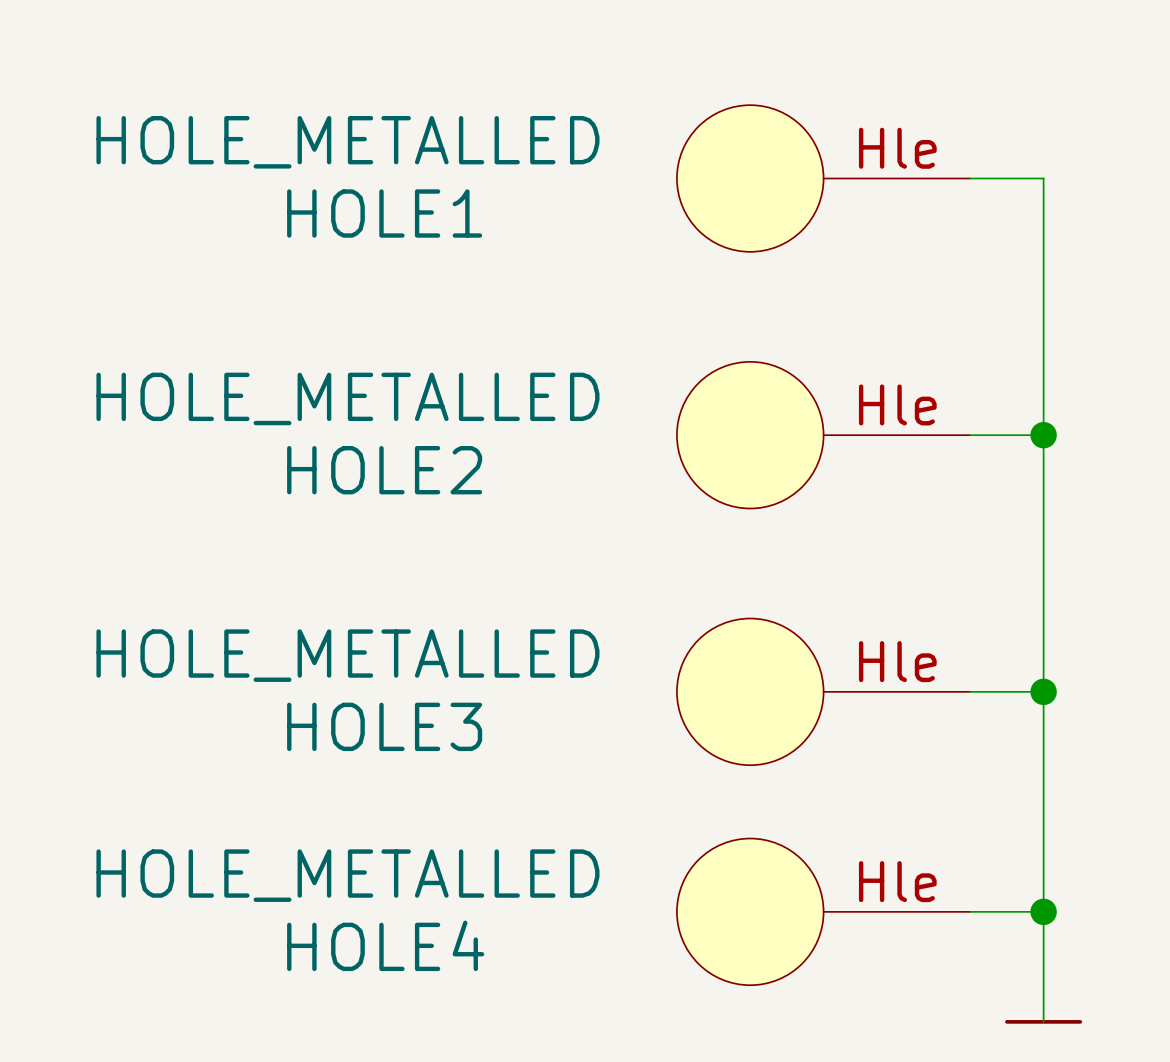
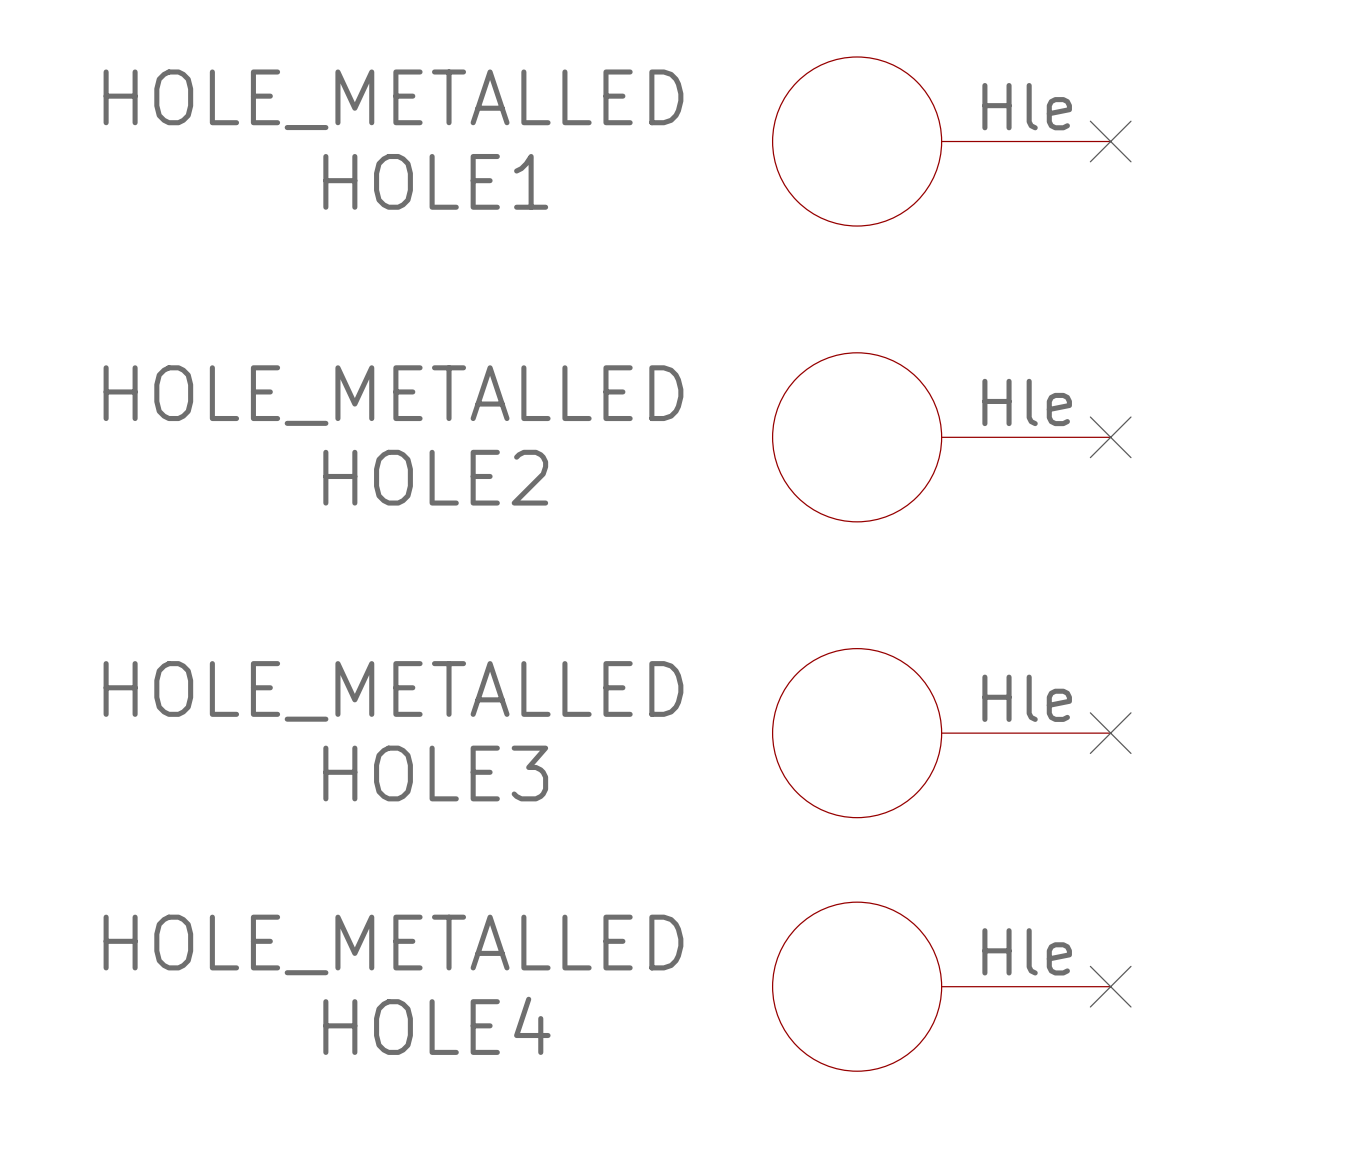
wire: (970, 178) (1043, 178) (1043, 1021) -> none
no-connect mark: none -> (1110, 141)
wire: (970, 435) (1043, 435) -> none
no-connect mark: none -> (1110, 437)
junction: (1043, 435) -> none
wire: (970, 691) (1043, 691) -> none
no-connect mark: none -> (1110, 733)
junction: (1043, 691) -> none
wire: (970, 911) (1043, 911) -> none
no-connect mark: none -> (1110, 986)
junction: (1043, 911) -> none
power symbol: (1043, 1021) -> none

